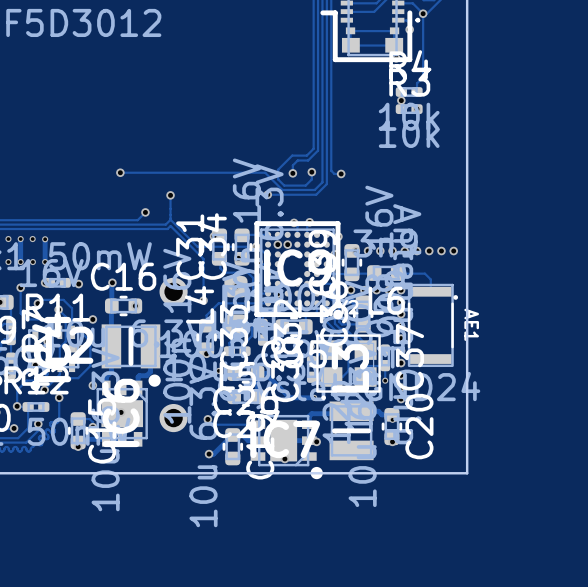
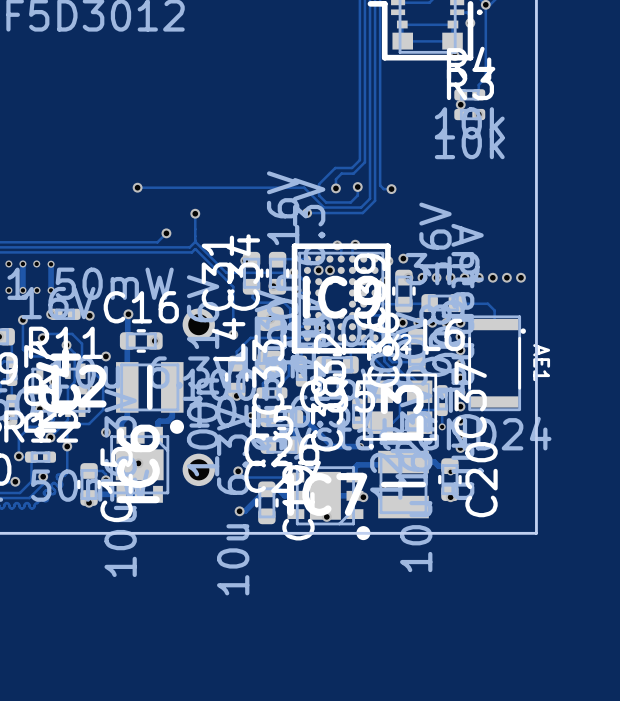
via: none -> (403, 258)

